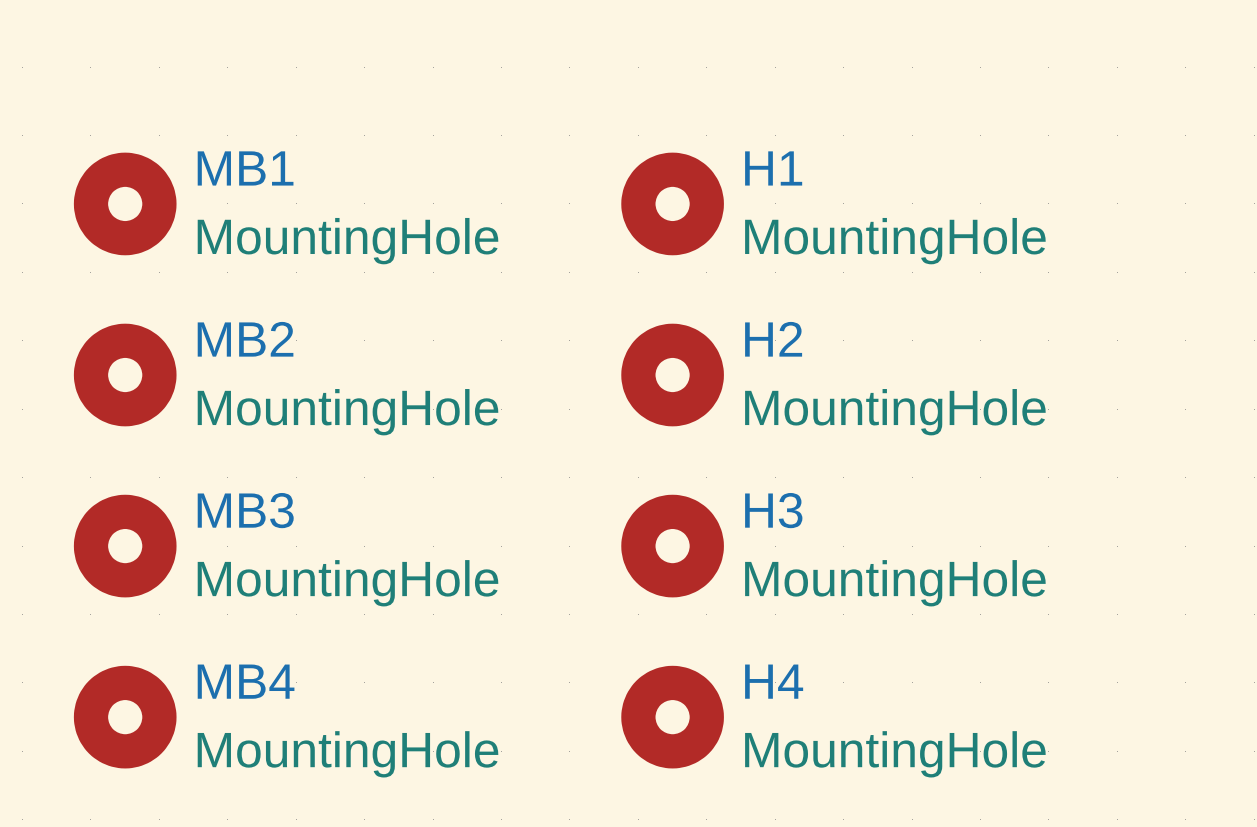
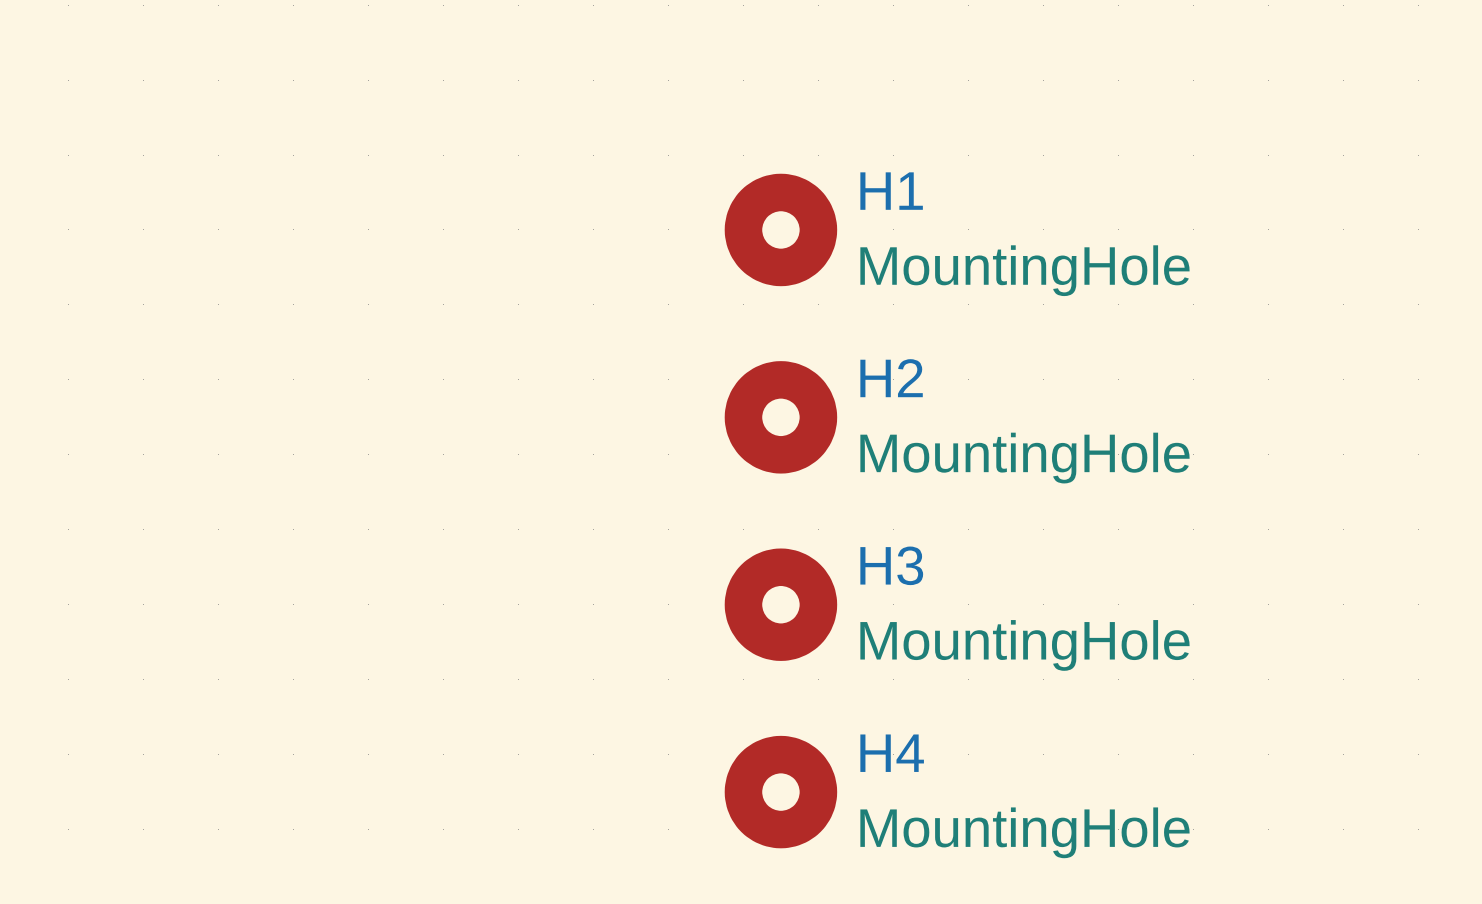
MB1: MountingHole (125, 203) -> none
MB2: MountingHole (125, 375) -> none
MB3: MountingHole (125, 546) -> none
MB4: MountingHole (125, 717) -> none

